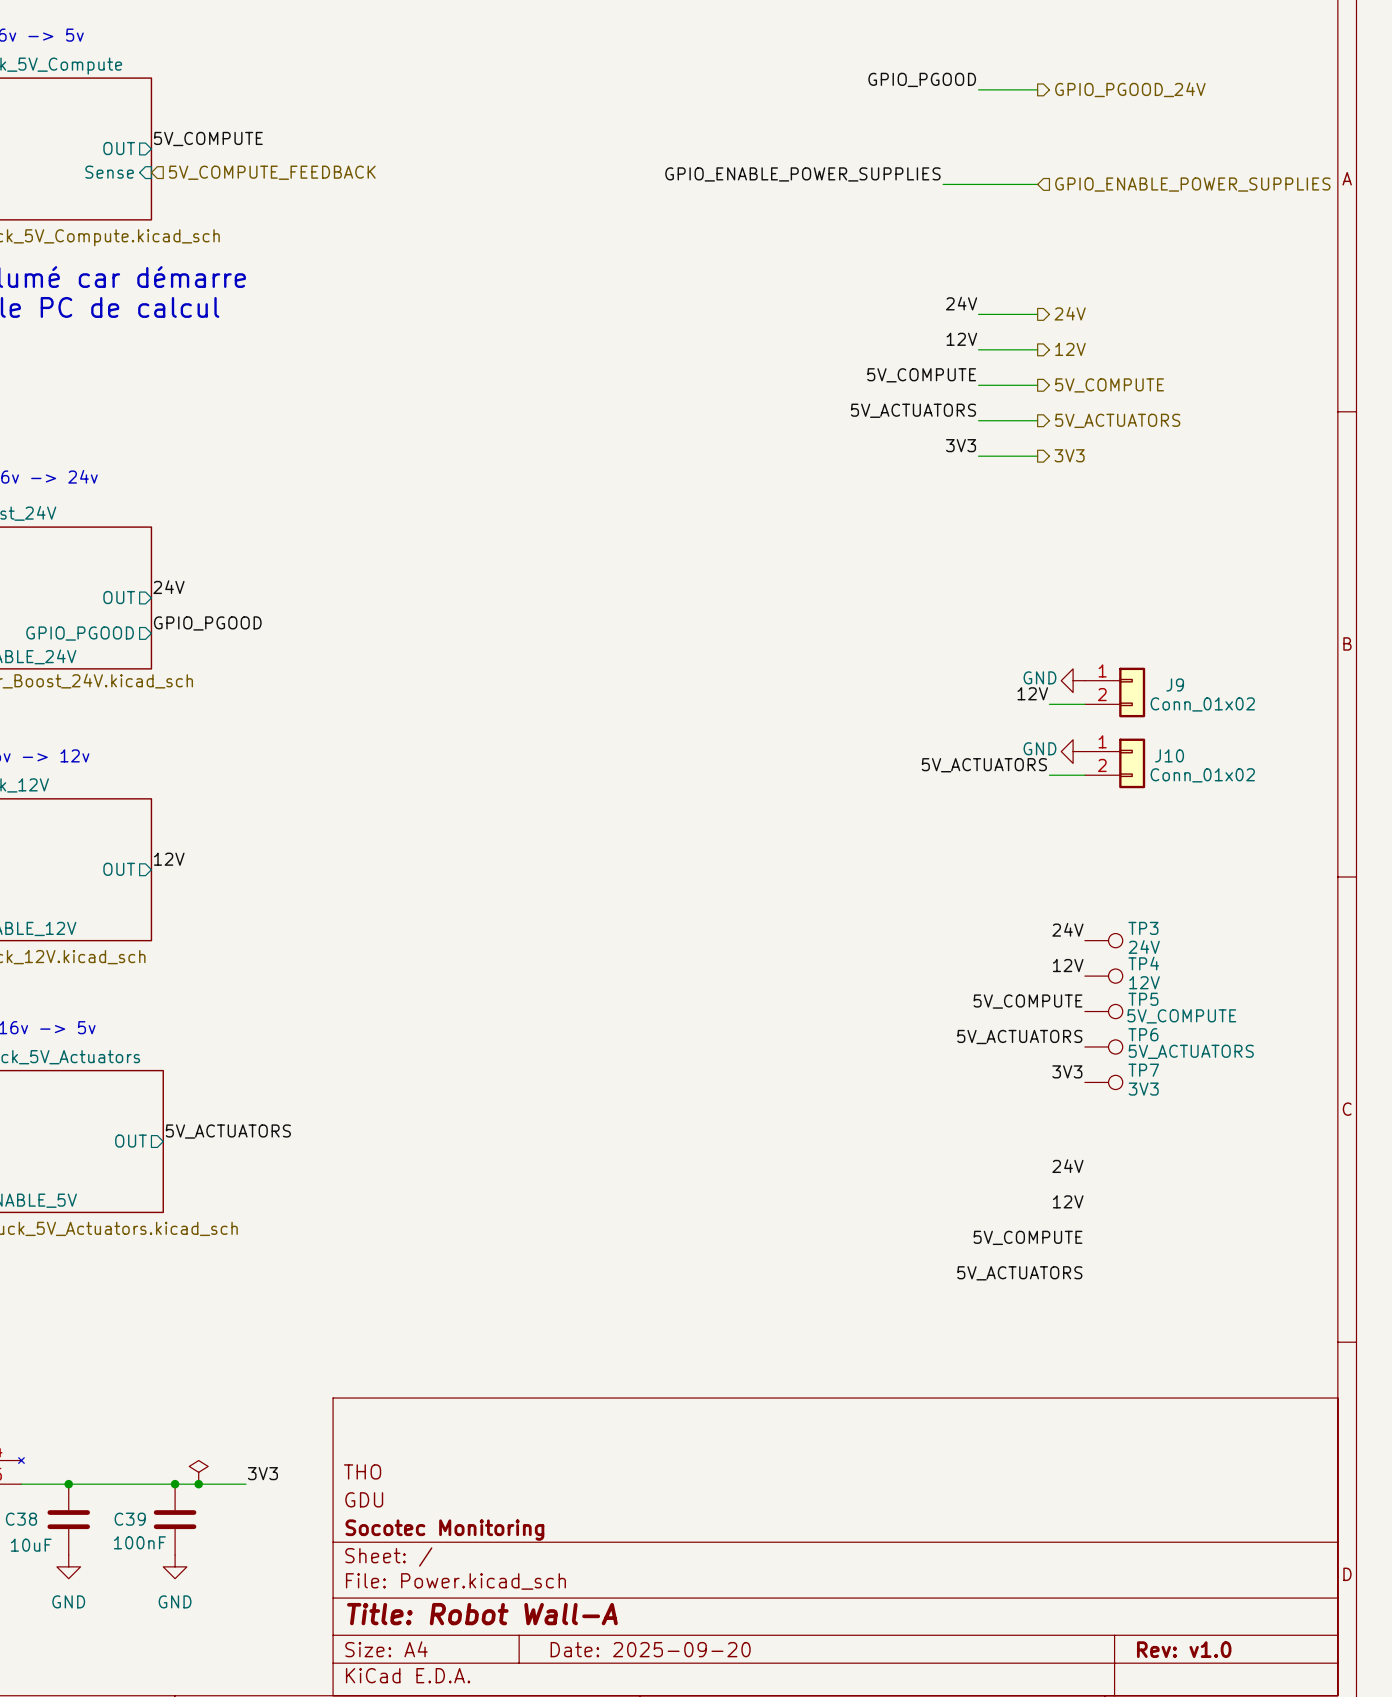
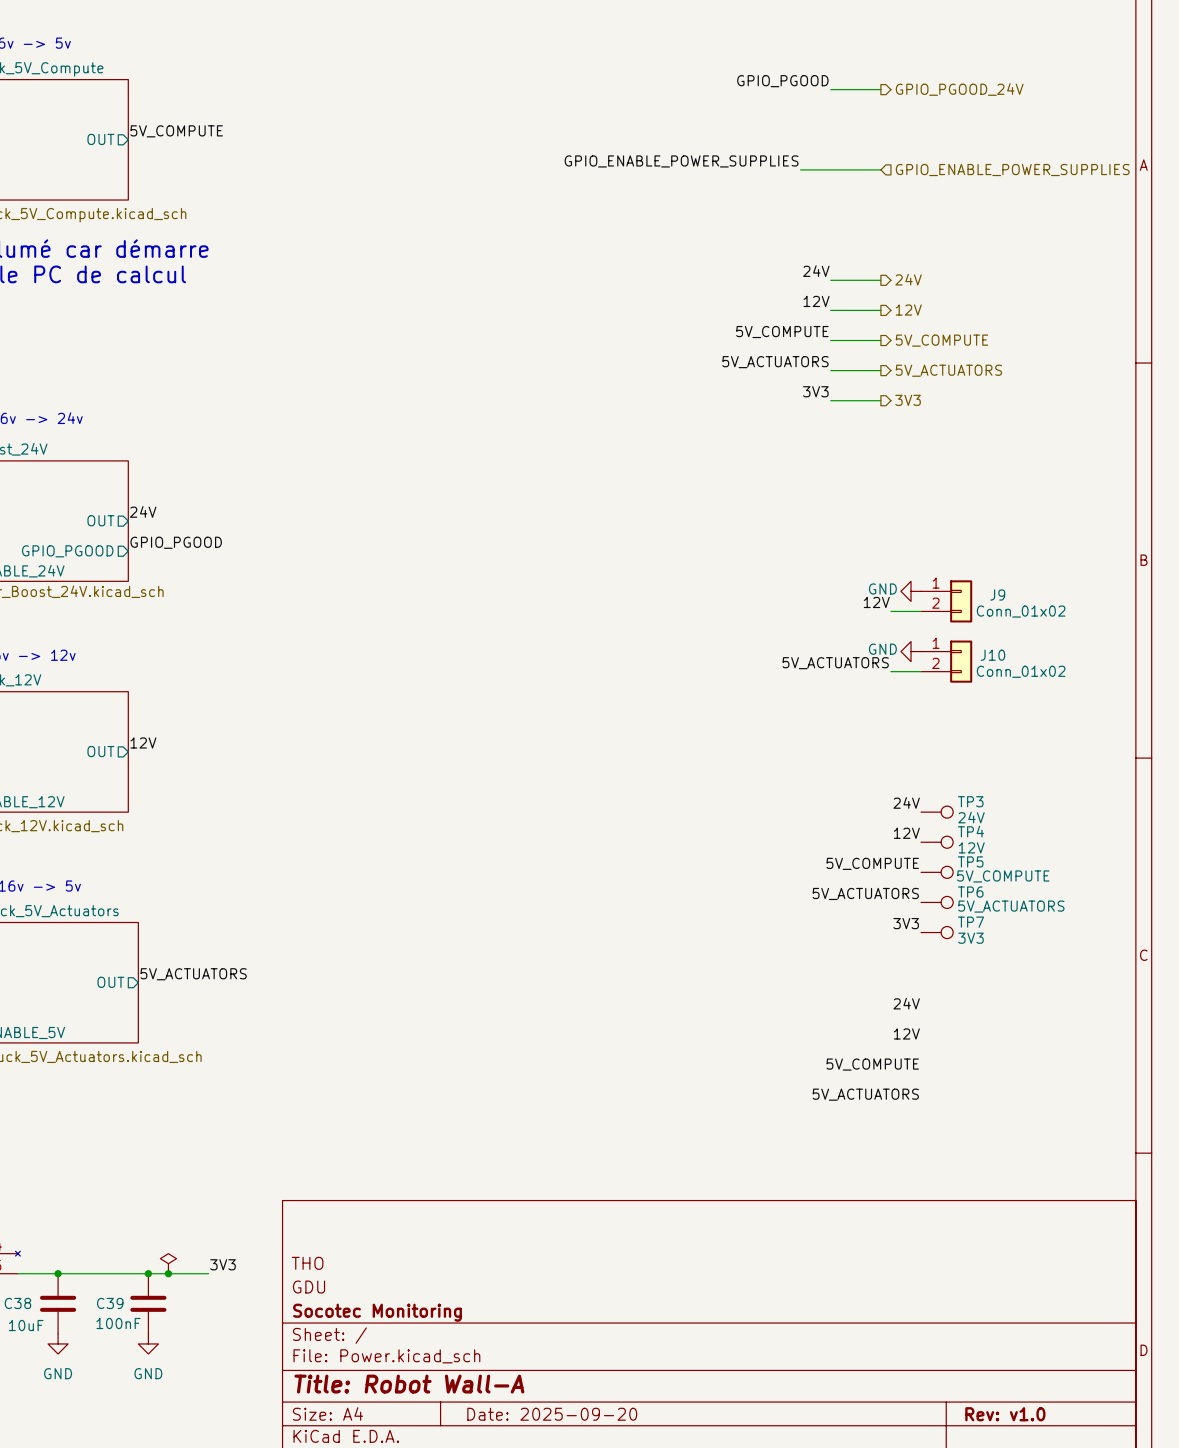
sheet pin: Sense (109, 172) -> none
hierarchical label: 5V_COMPUTE_FEEDBACK (272, 172) -> none

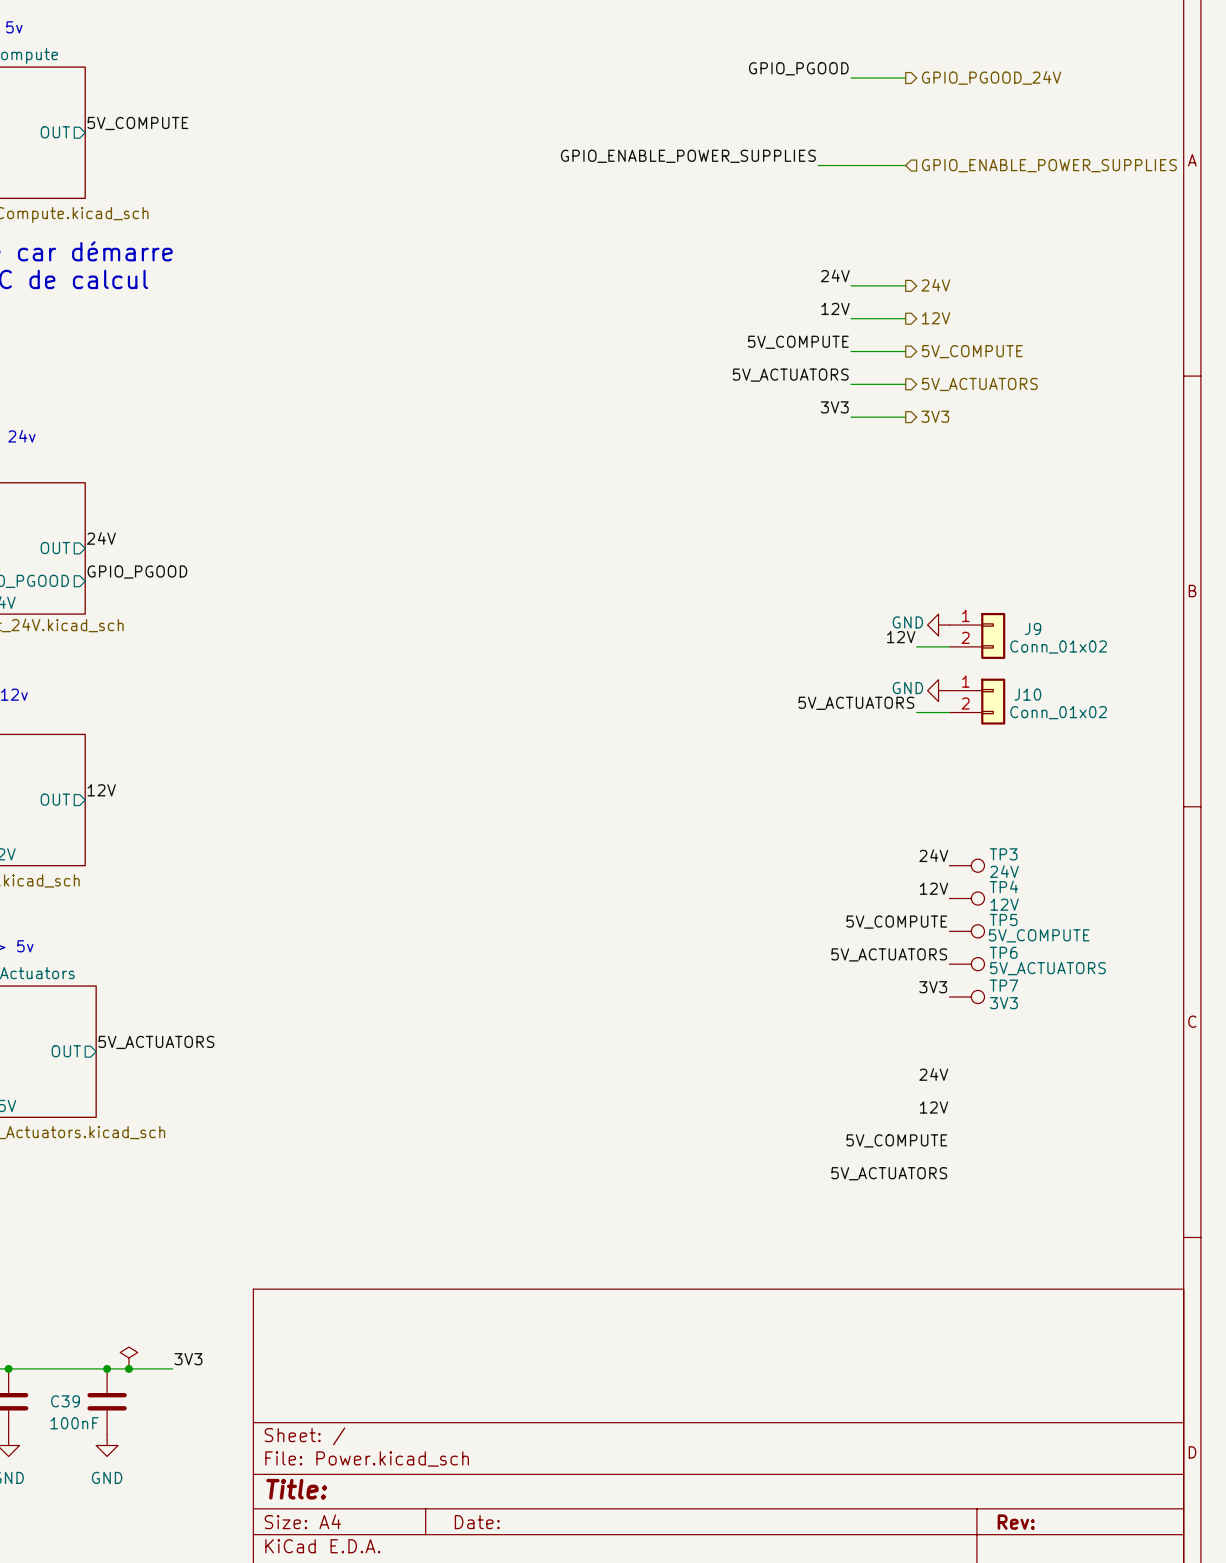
title block: THO (307, 1263) -> none
title block: GDU (309, 1287) -> none
title block: Socotec Monitoring (377, 1312) -> none
title block: Title: Robot Wall-A (409, 1384) -> Title: (296, 1489)
title block: Date: 2025-09-20 (552, 1414) -> Date: (477, 1522)
title block: Rev: v1.0 (1005, 1414) -> Rev: (1016, 1522)

